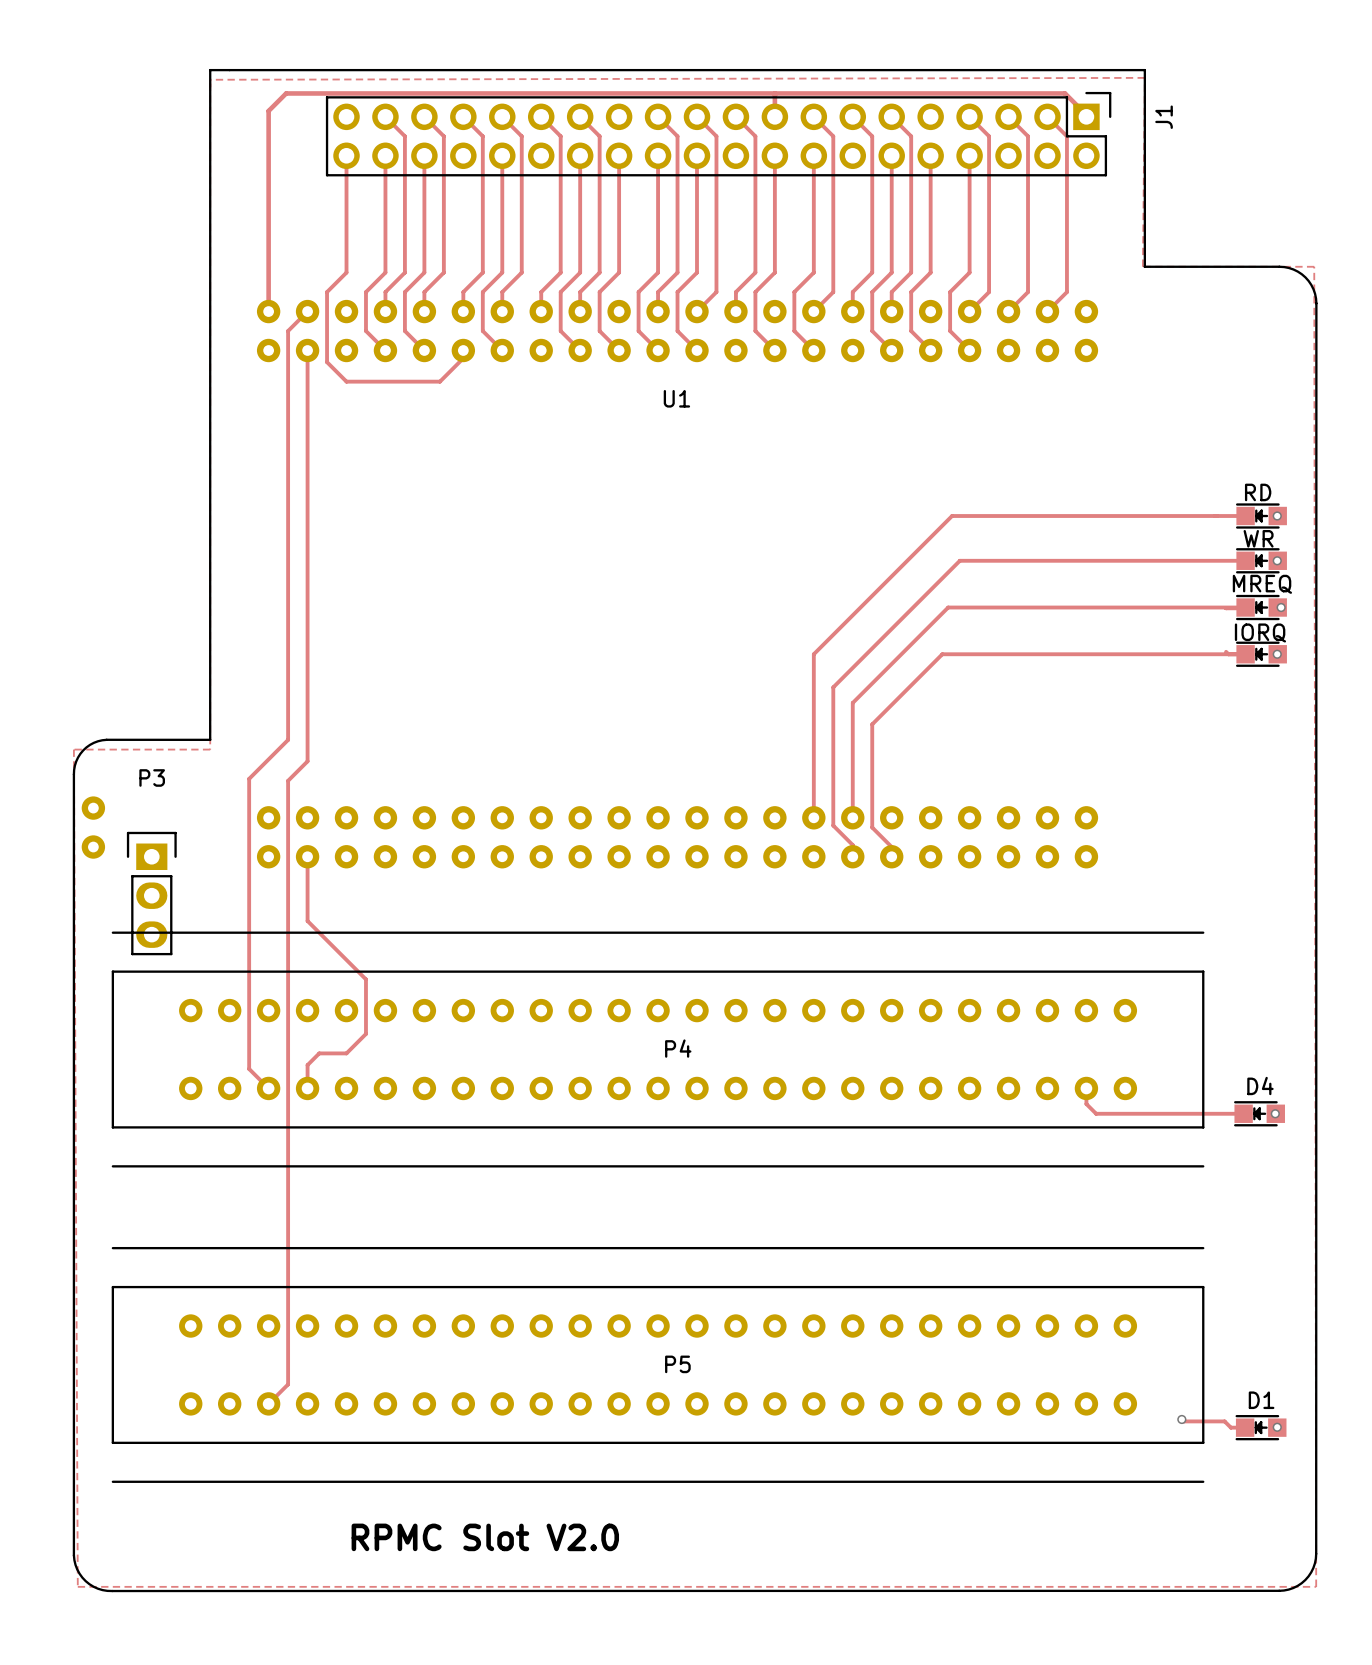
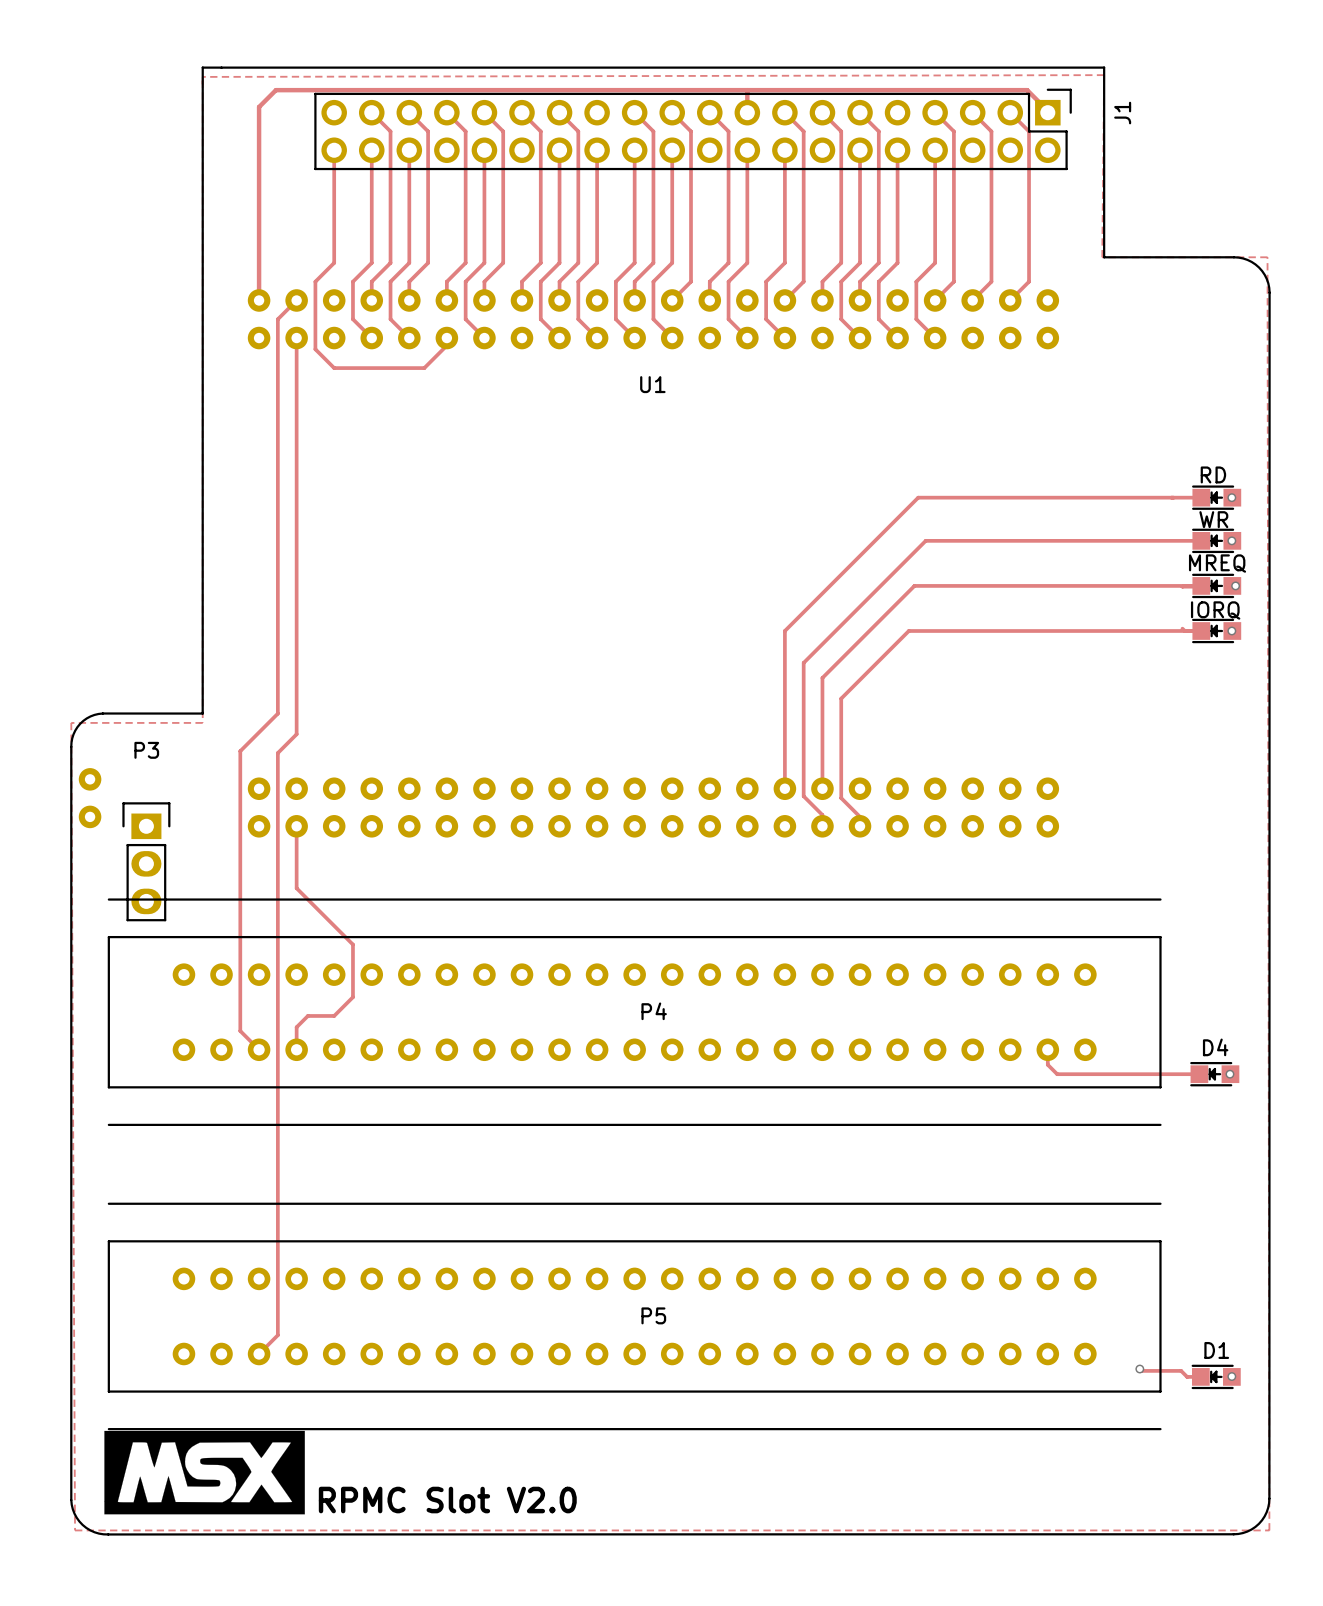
drawing: none -> [104, 1430, 305, 1515]
text position: RPMC Slot V2.0 (485, 1537) -> RPMC Slot V2.0 (447, 1500)

